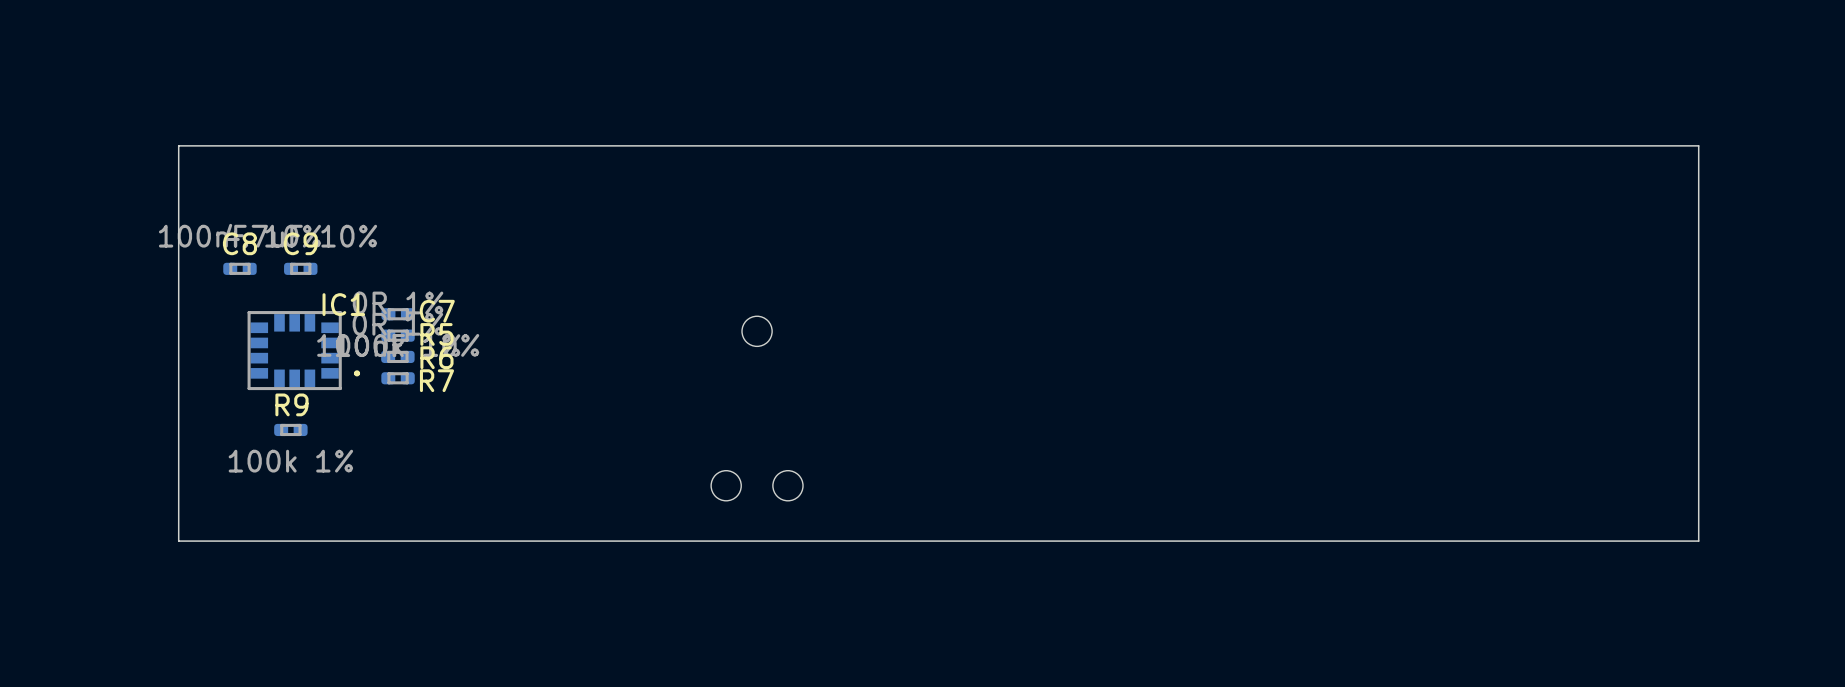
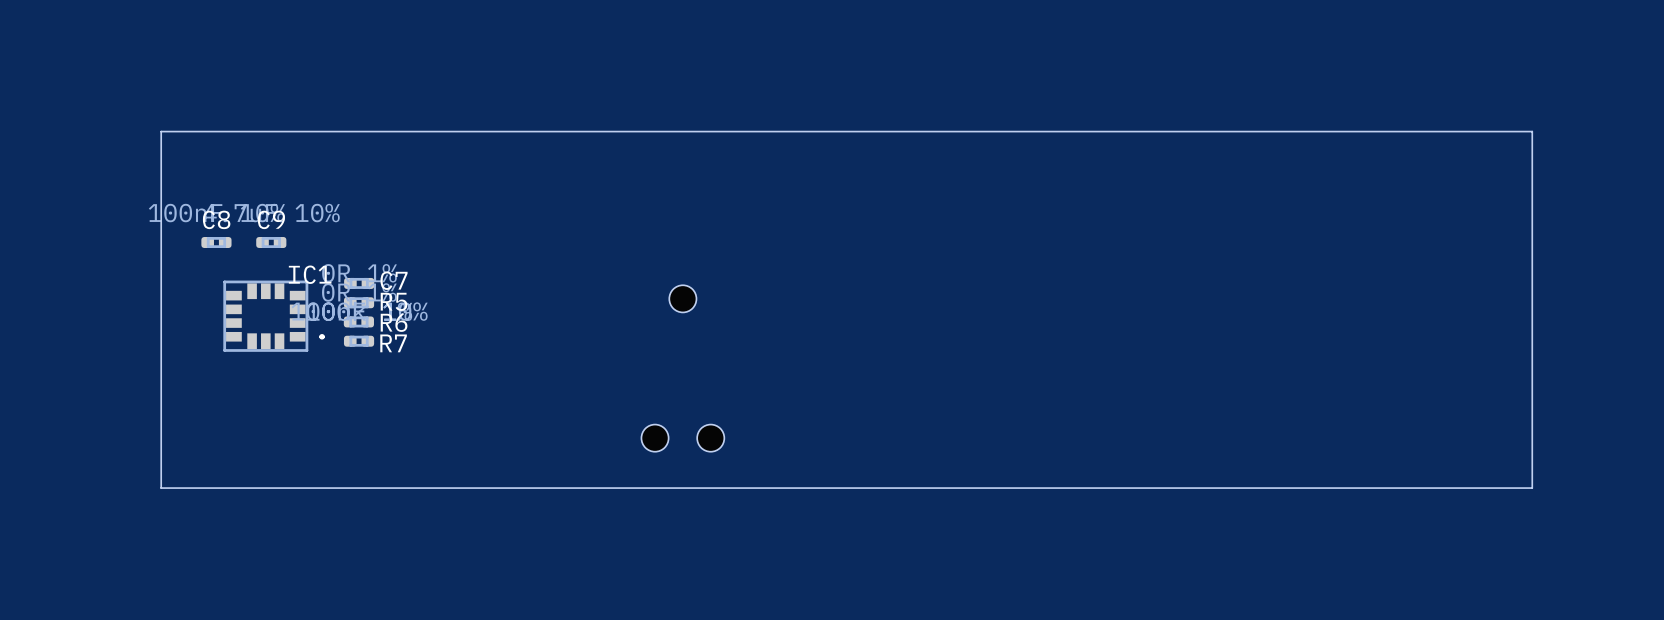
R9: 100k 1% (290, 429) -> none

